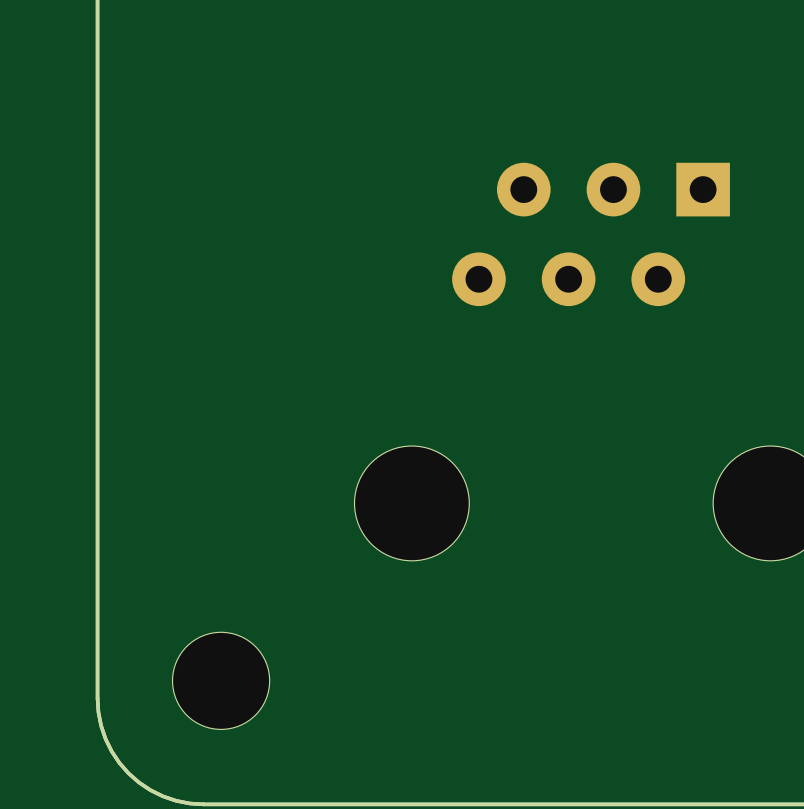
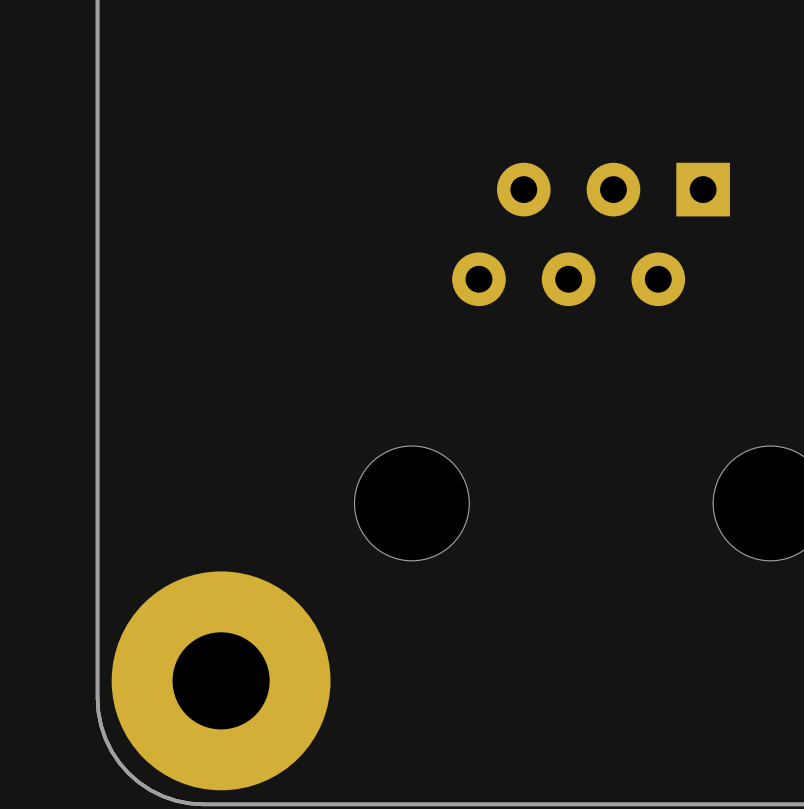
part footprint: [172, 632, 270, 730] -> [111, 571, 331, 791]

